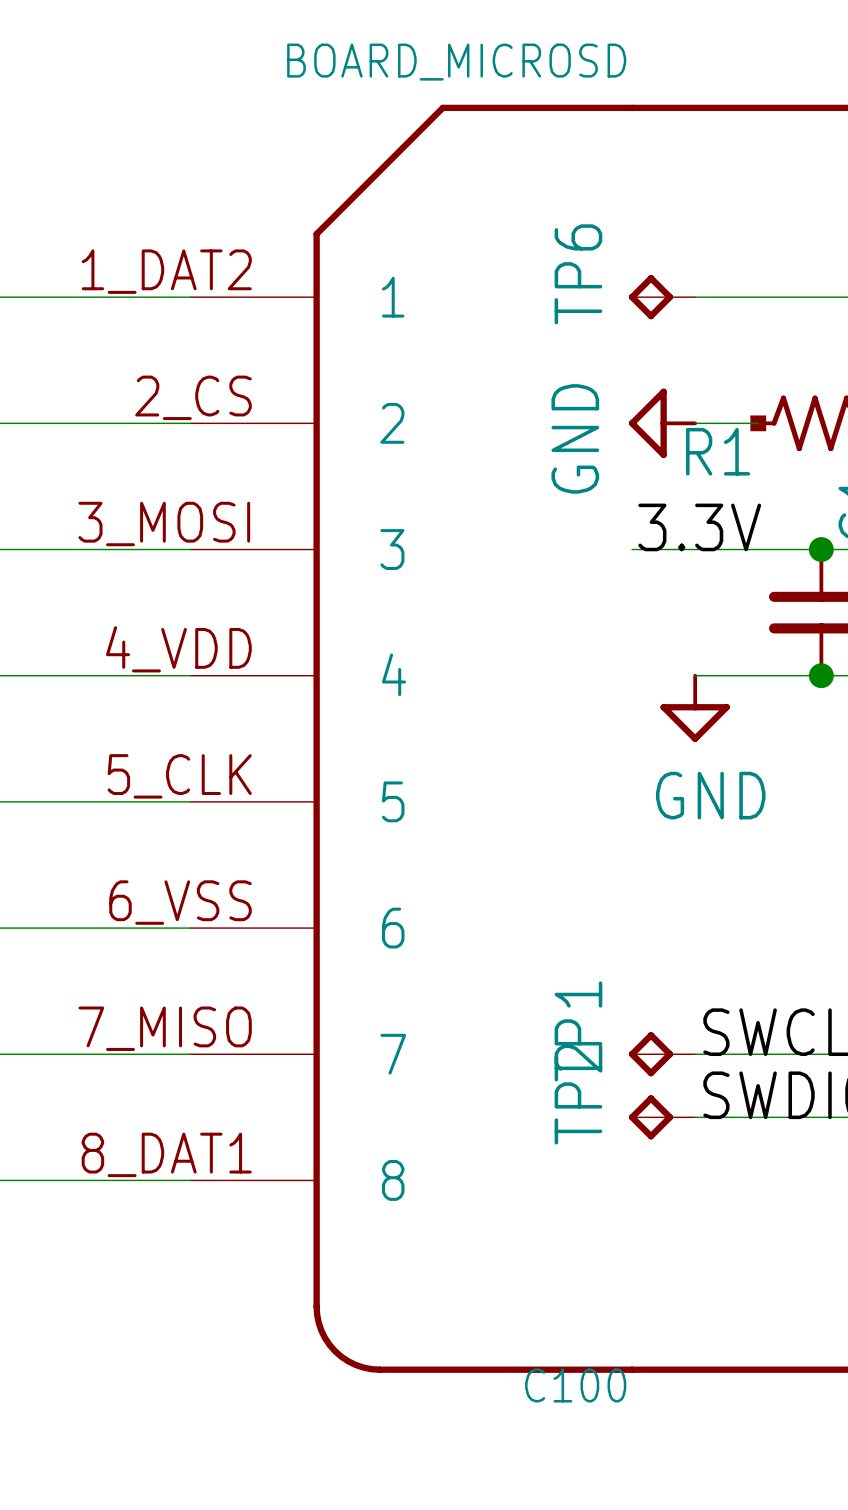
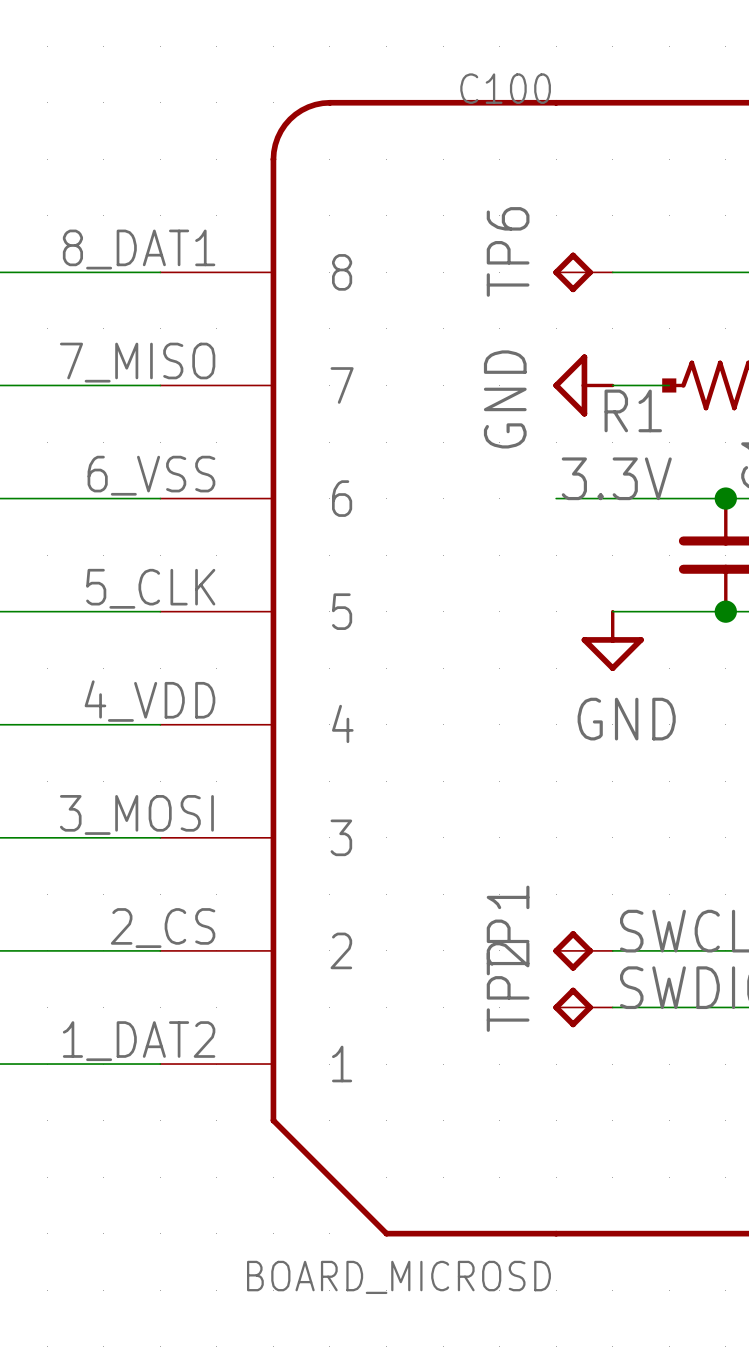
C100 flip: as is (474, 738) -> up-down (414, 668)

